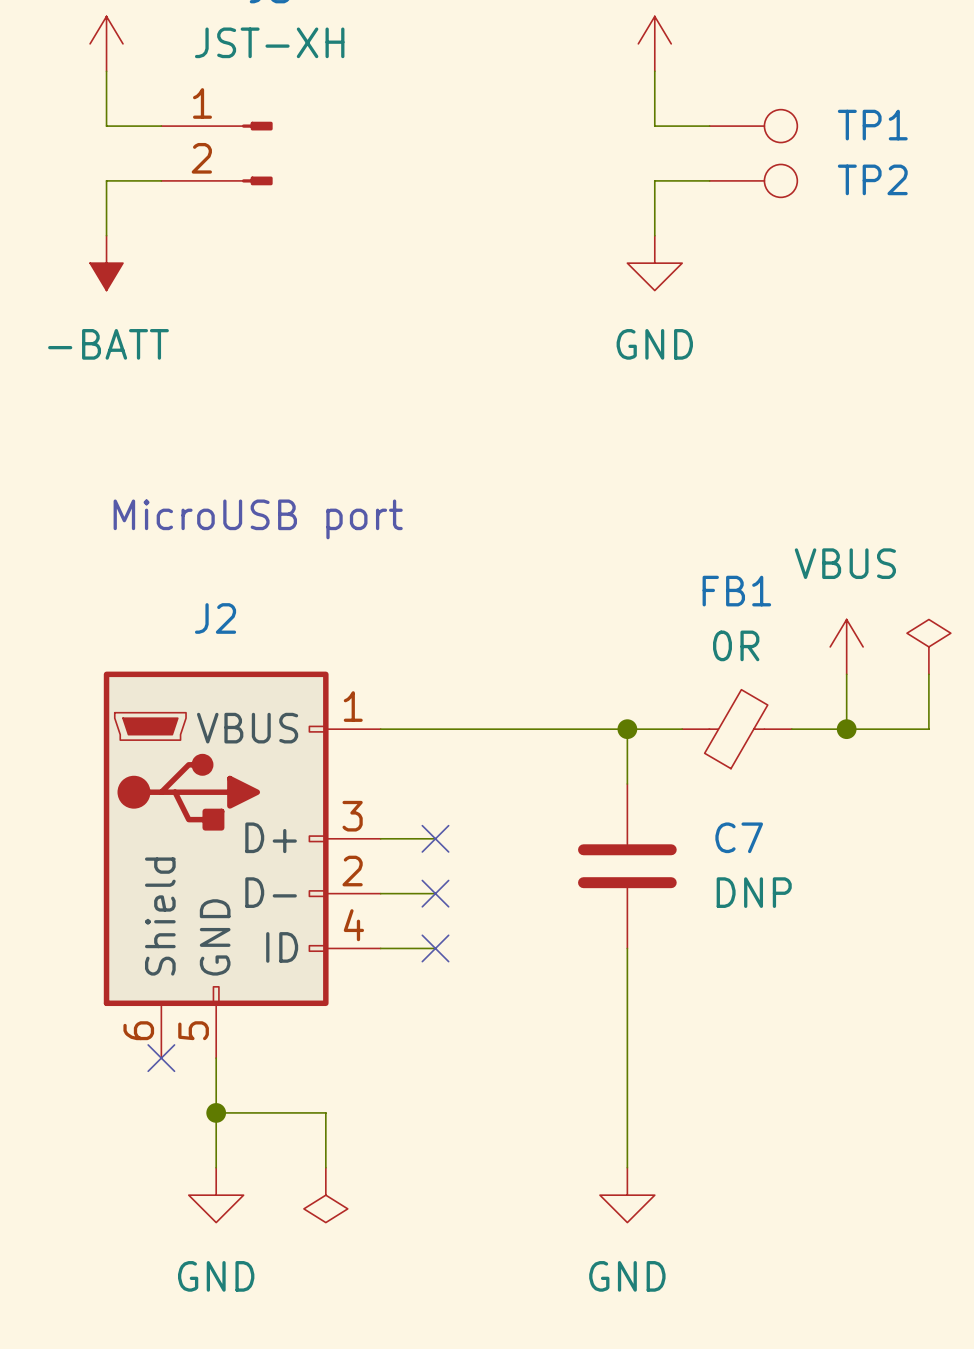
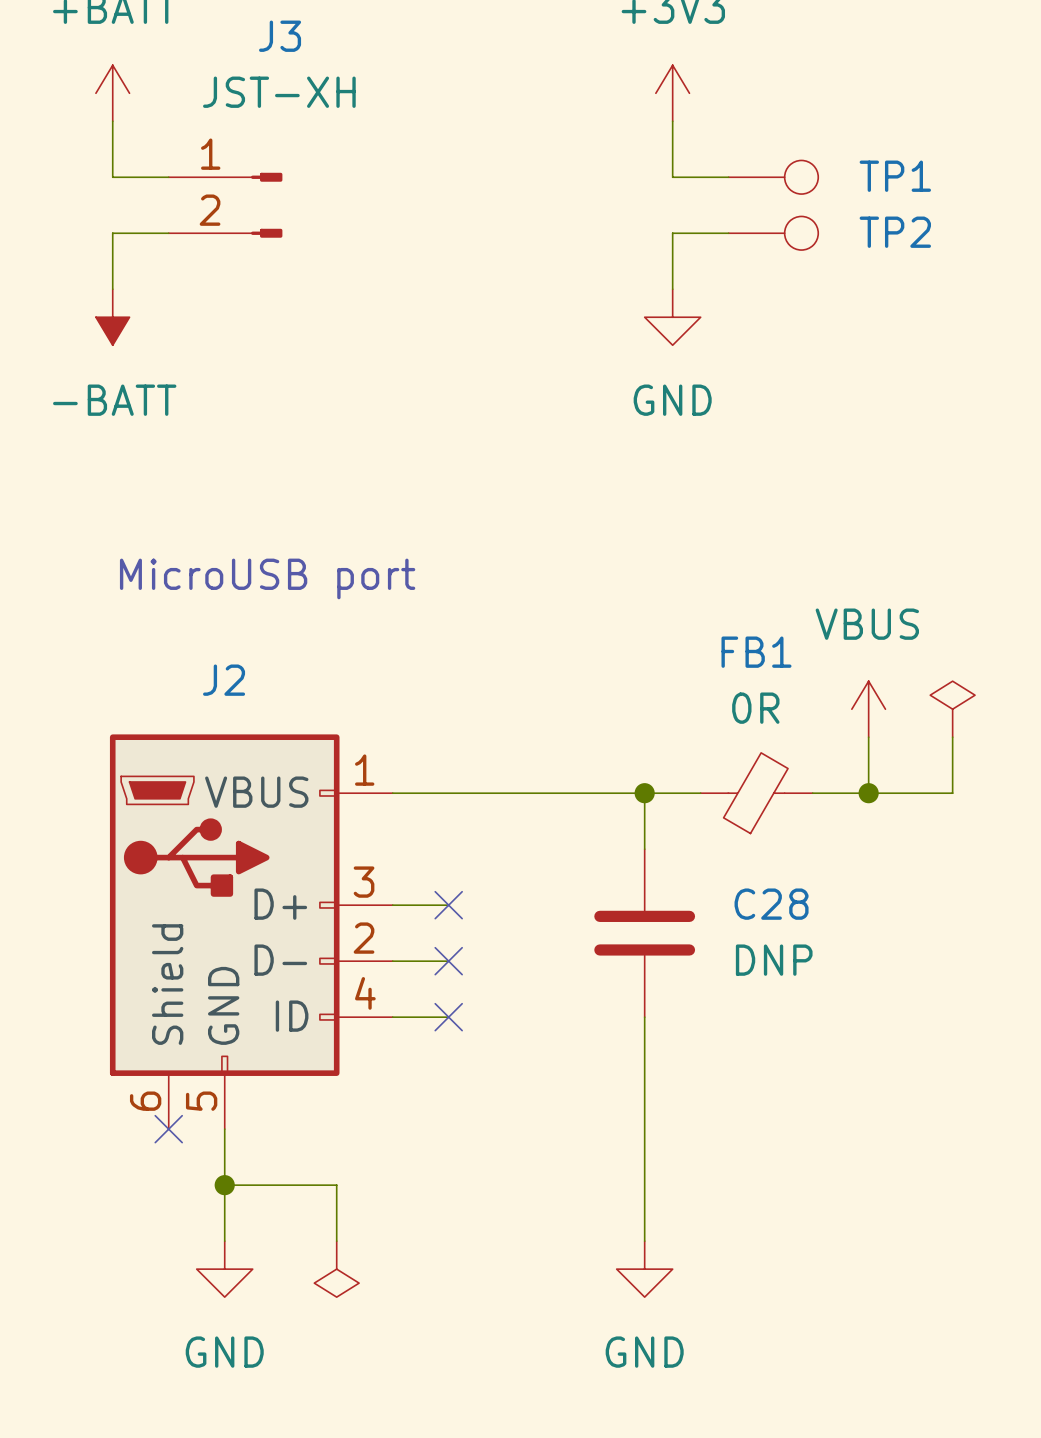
C7 name: C7 (739, 837) -> C28 (771, 904)

